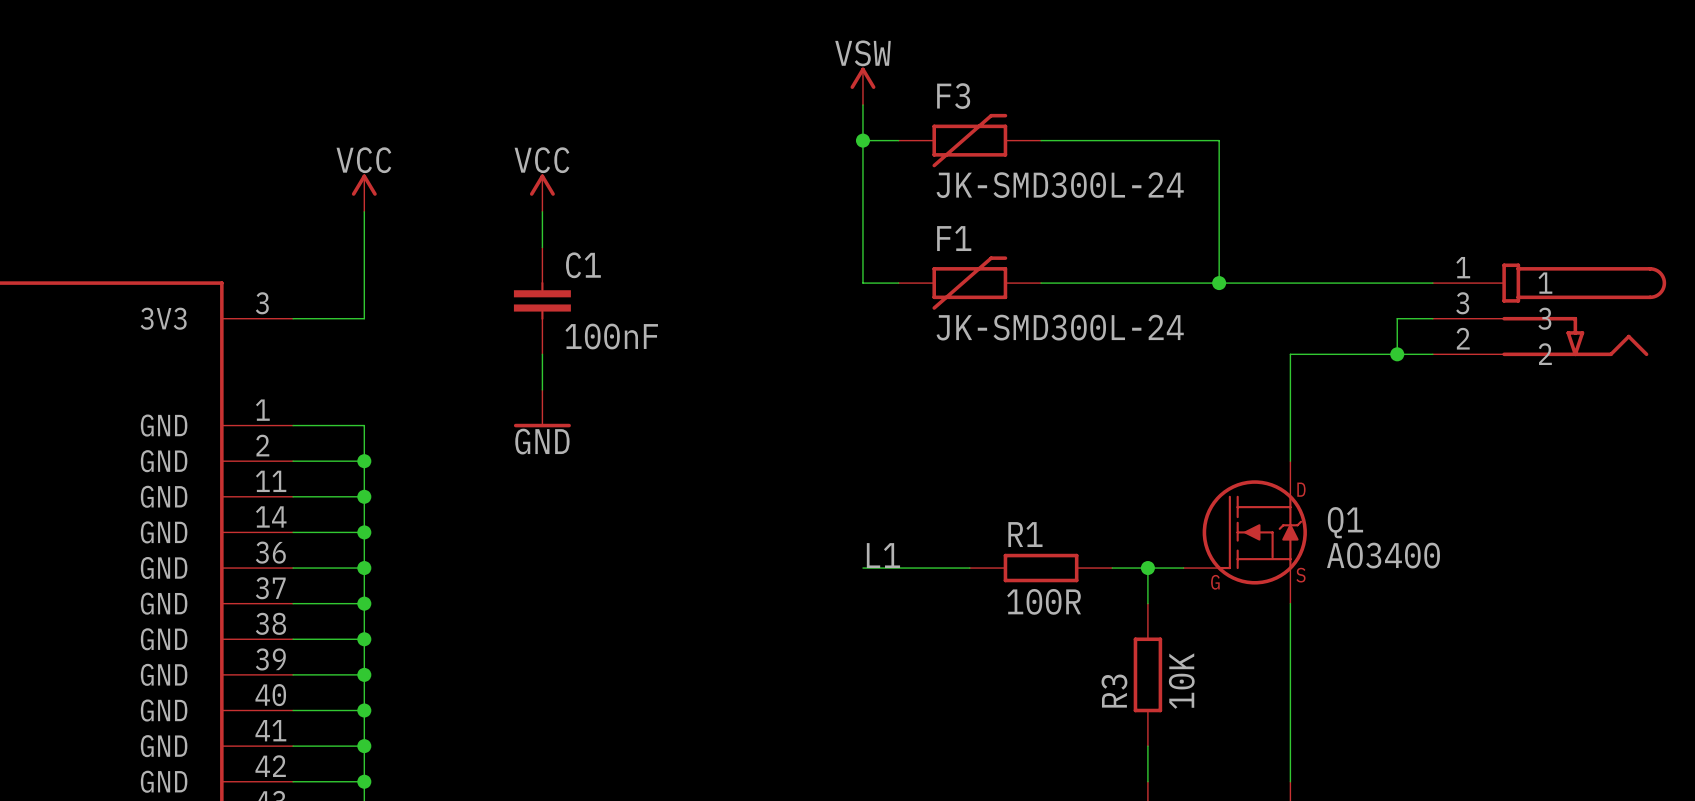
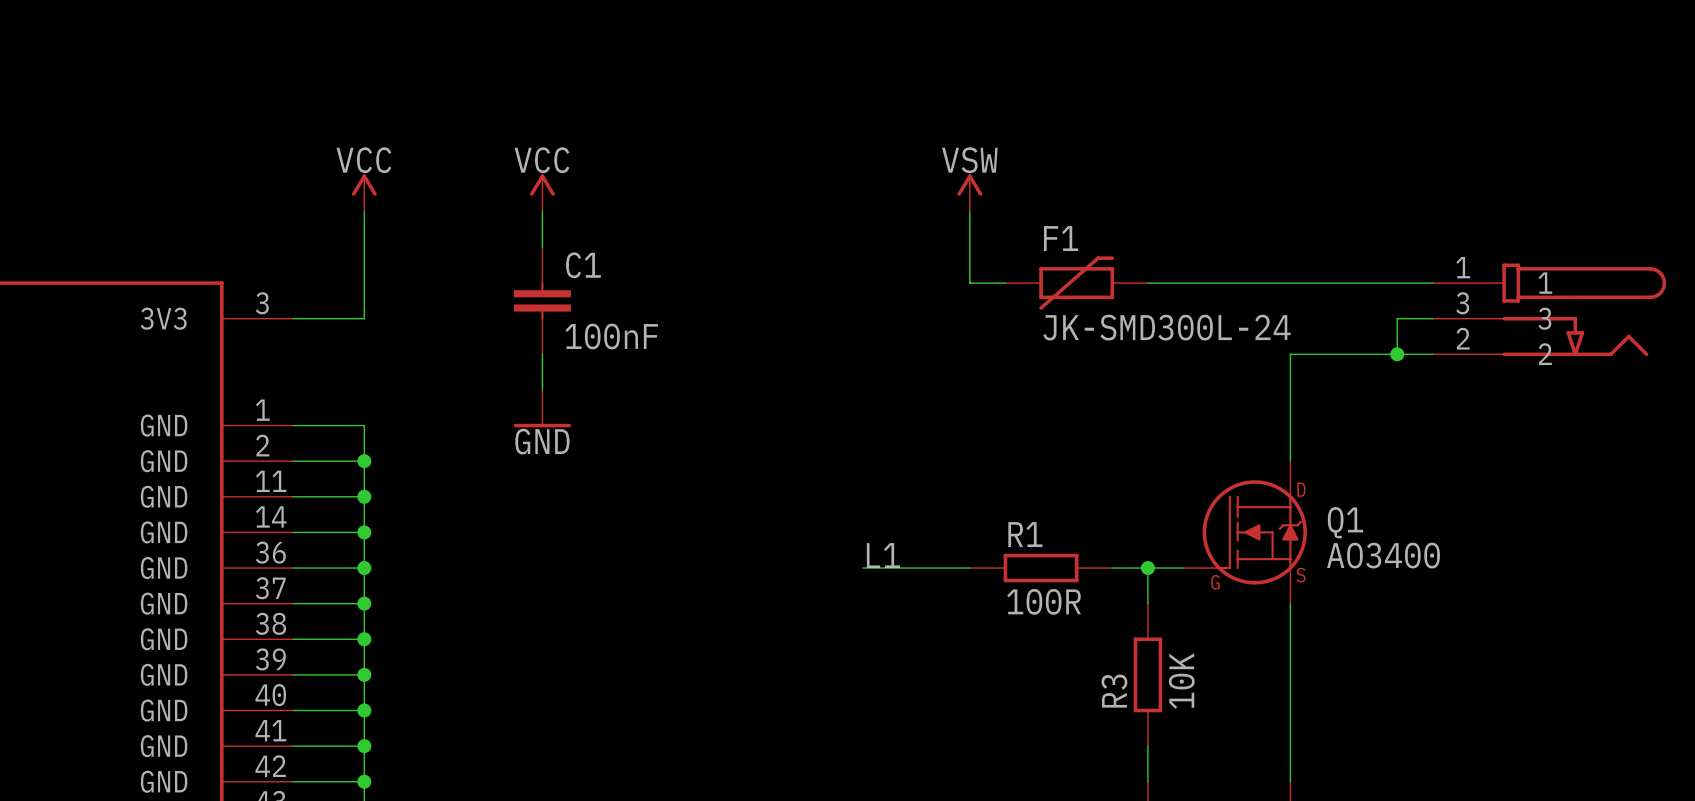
power symbol position: VSW (862, 86) -> VSW (969, 193)
wire: (862, 104) (862, 283) (898, 283) -> none
wire: (862, 140) (898, 140) -> none
junction: (862, 140) -> none
F3: JK-SMD300L-24 (969, 140) -> none
wire: (1041, 140) (1219, 140) (1219, 283) -> none
wire: none -> (969, 211) (969, 283) (1005, 283)
F1 position: (969, 283) -> (1076, 283)
wire: (1041, 283) (1147, 283) -> none
junction: (1219, 283) -> none

